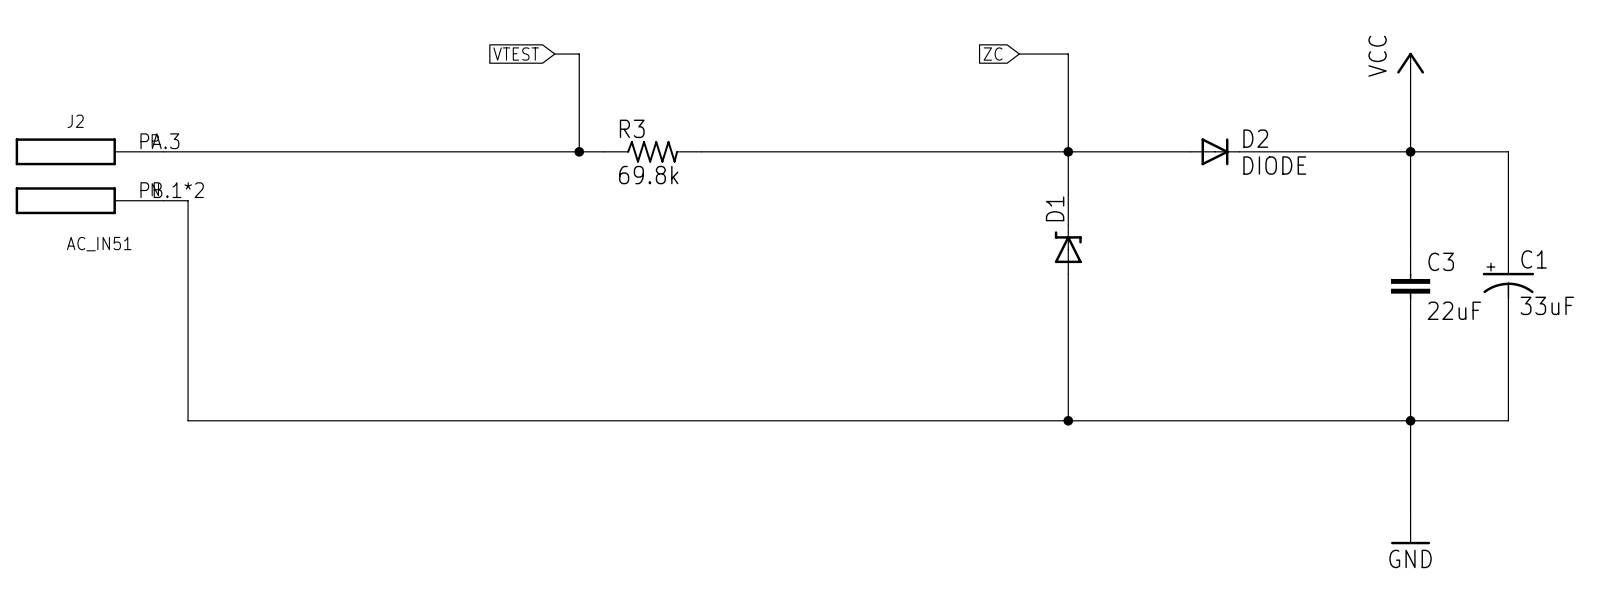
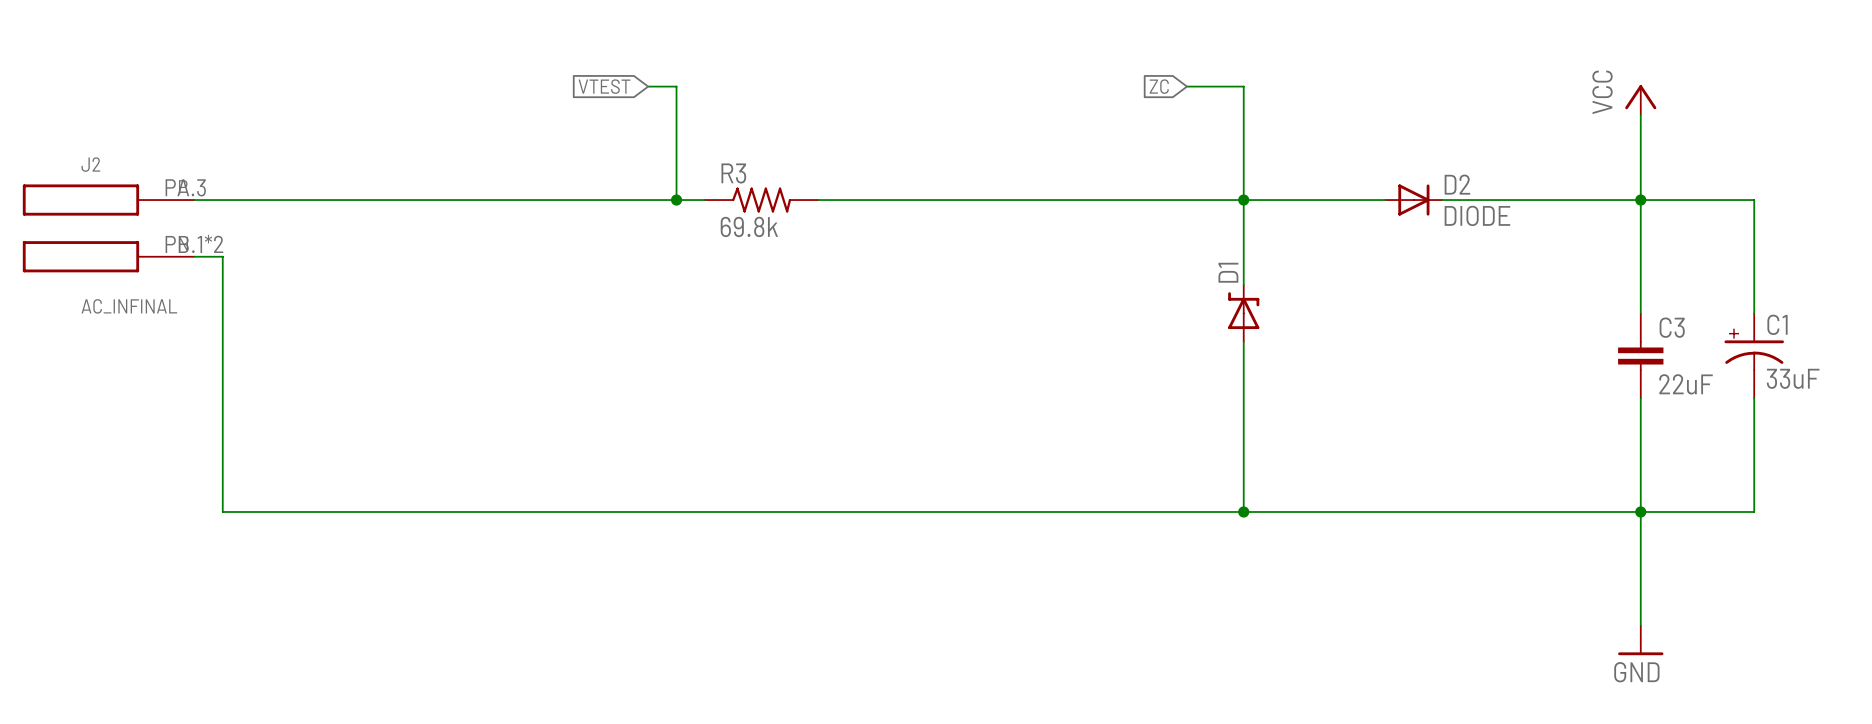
J2 value: AC_IN51 (99, 244) -> AC_INFINAL (129, 306)

